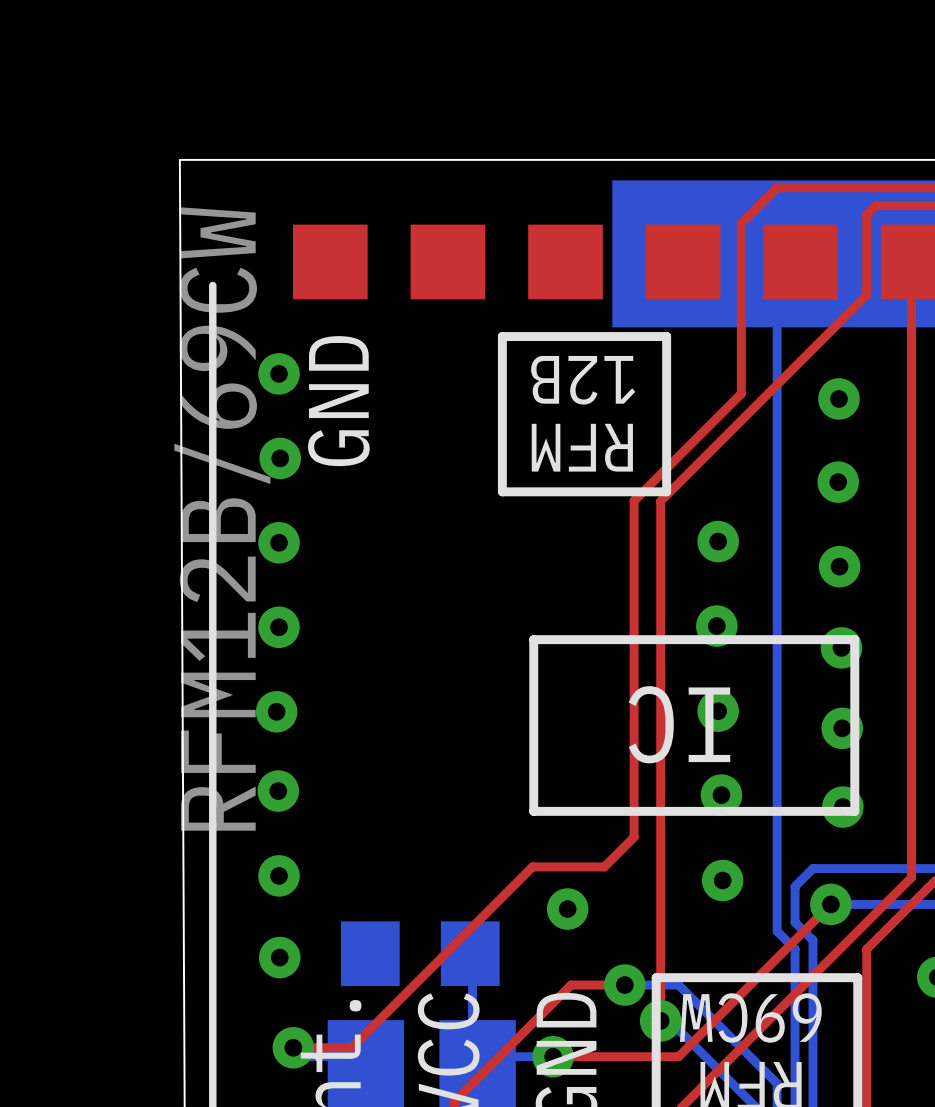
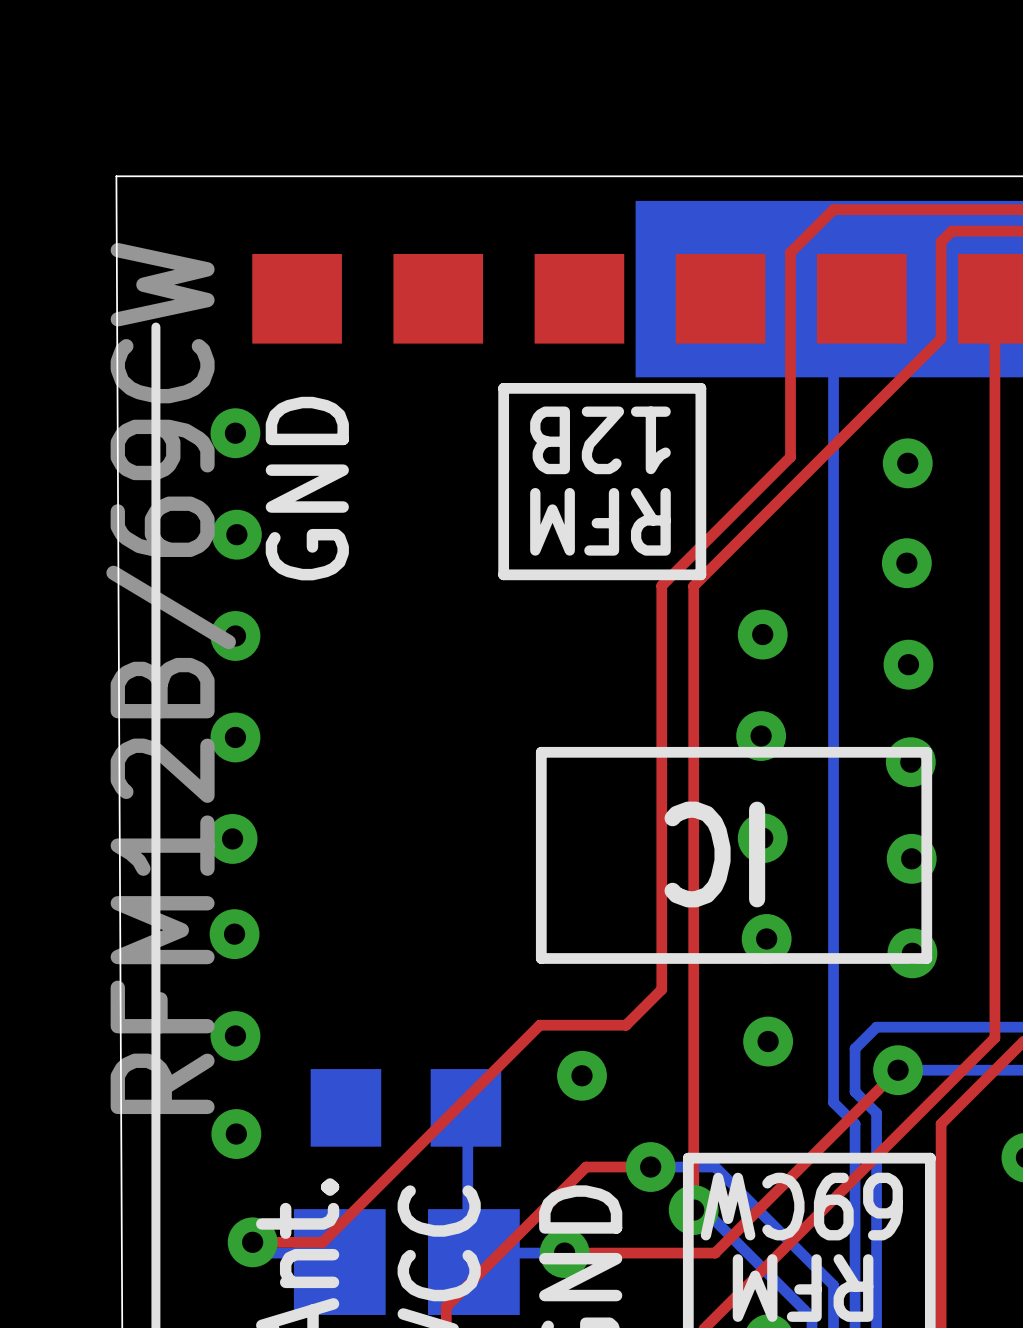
part position: (420, 953) -> (405, 1107)

